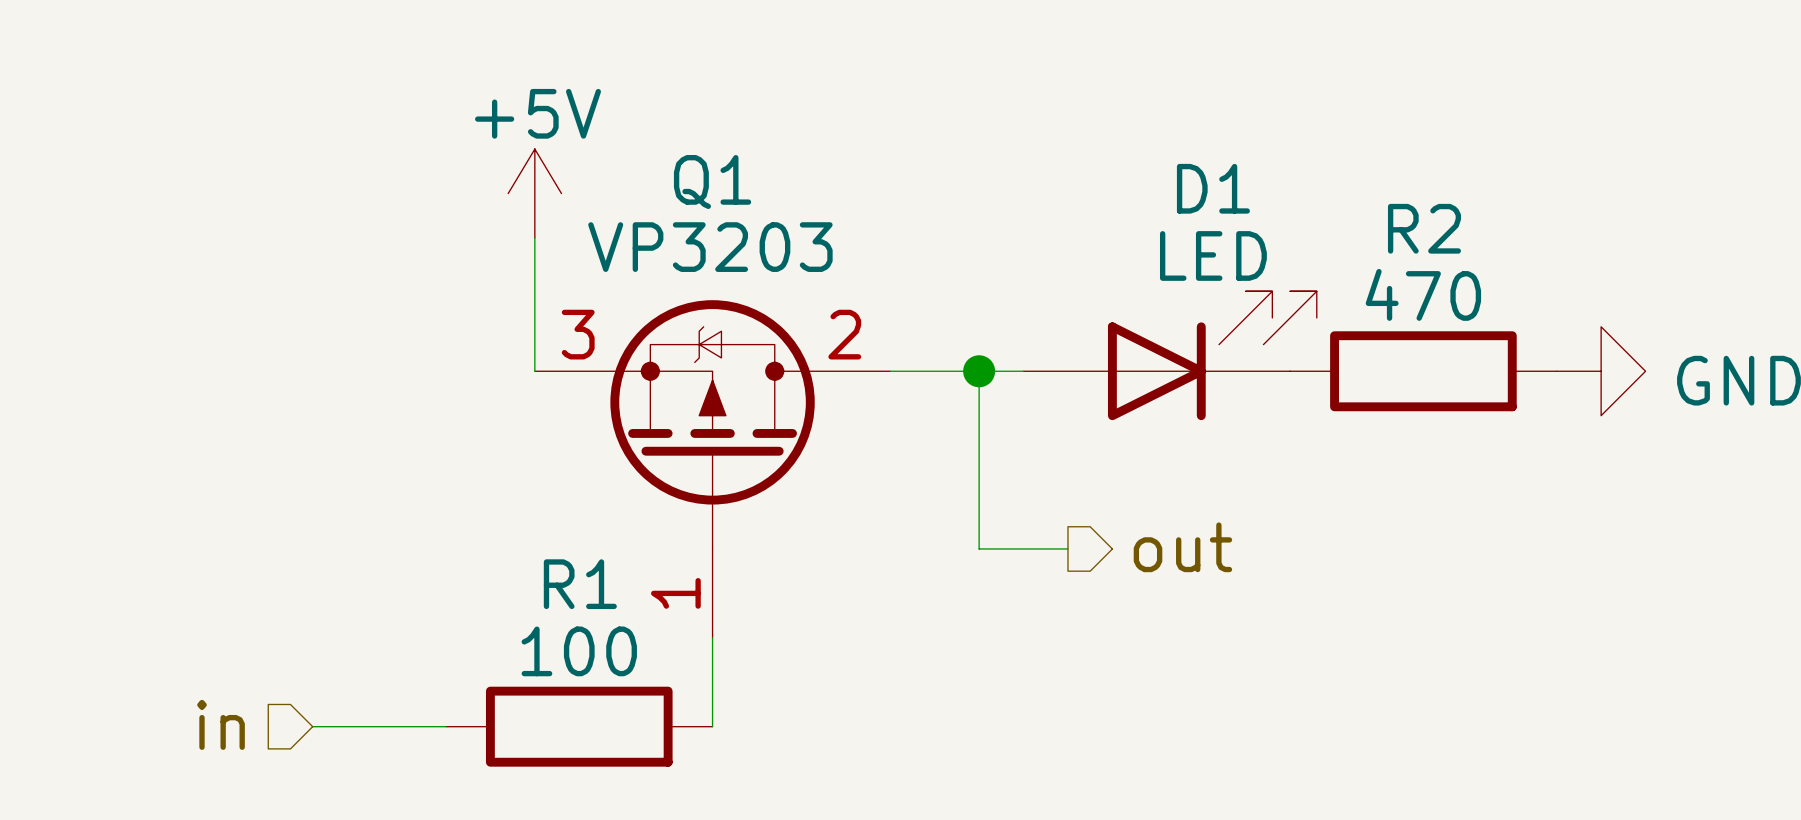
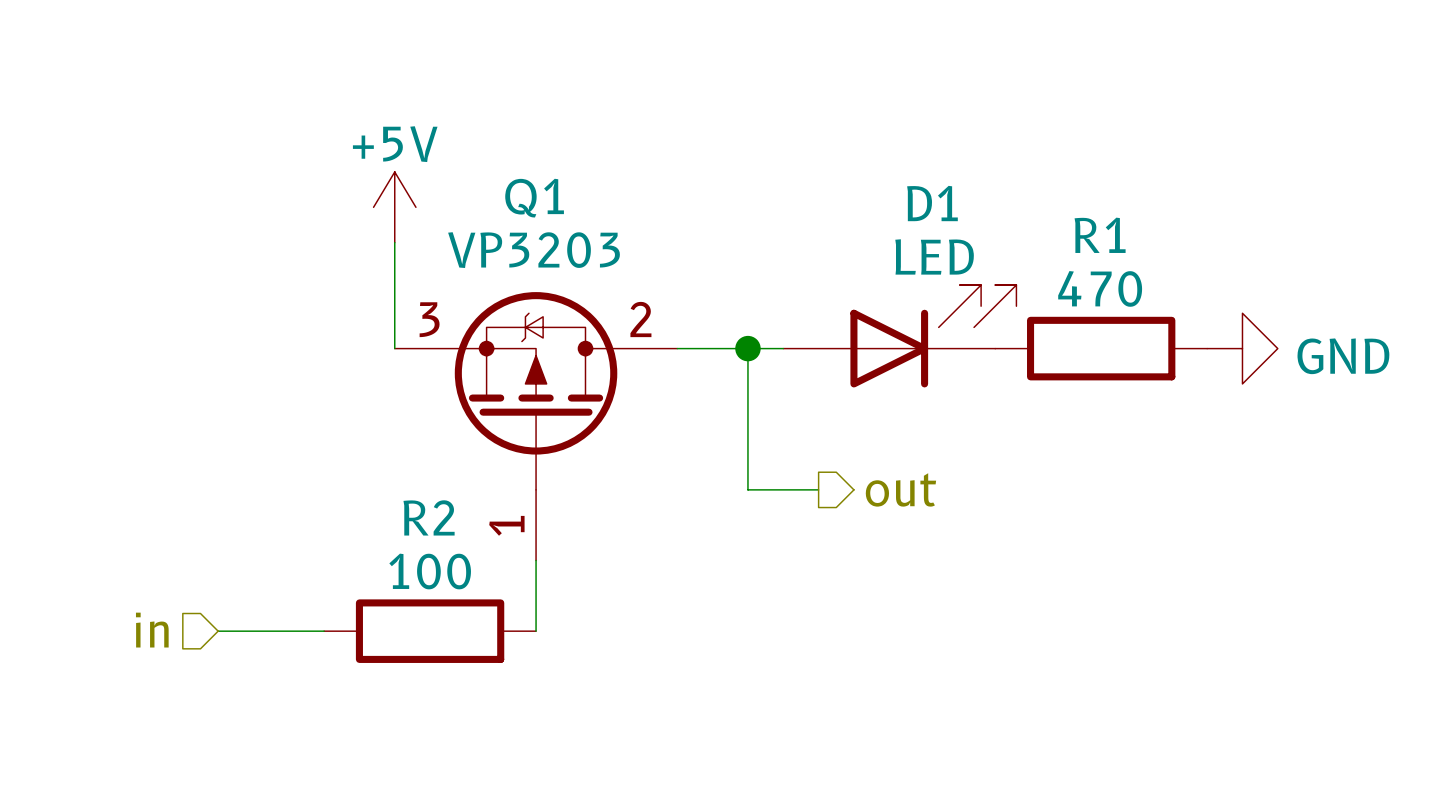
R2 name: R2 (1424, 228) -> R1 (1100, 235)
R1 name: R1 (580, 584) -> R2 (429, 517)

